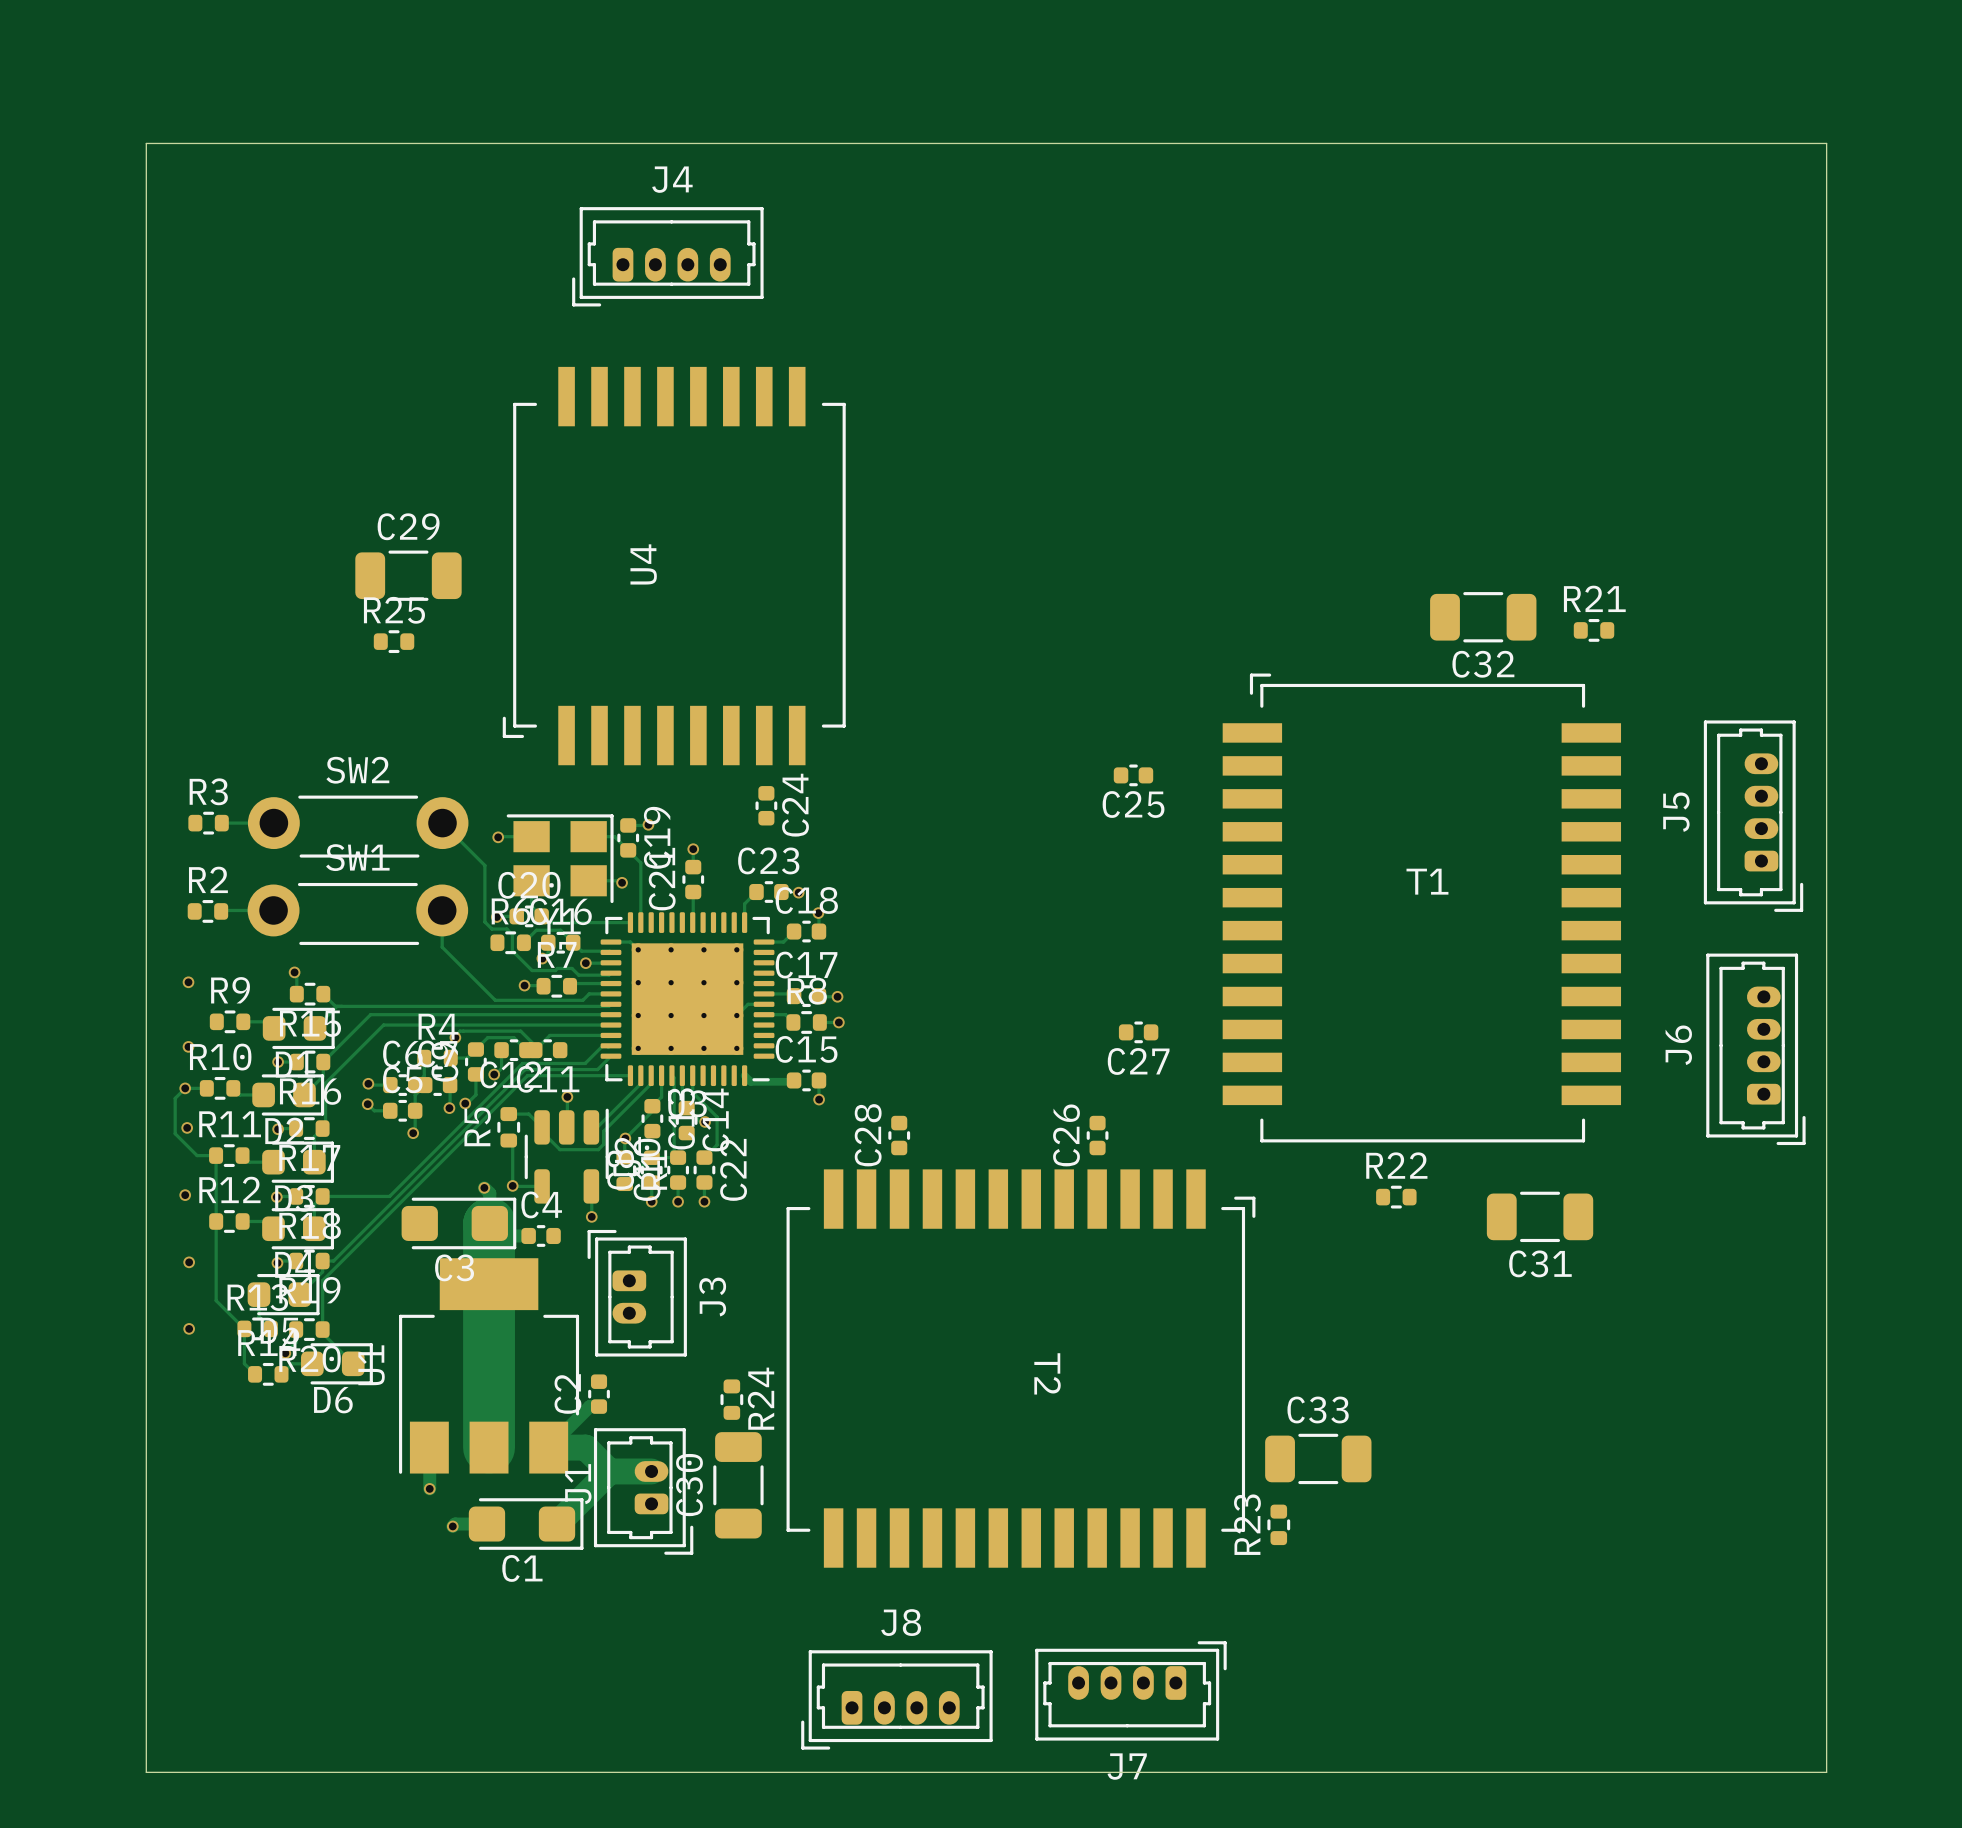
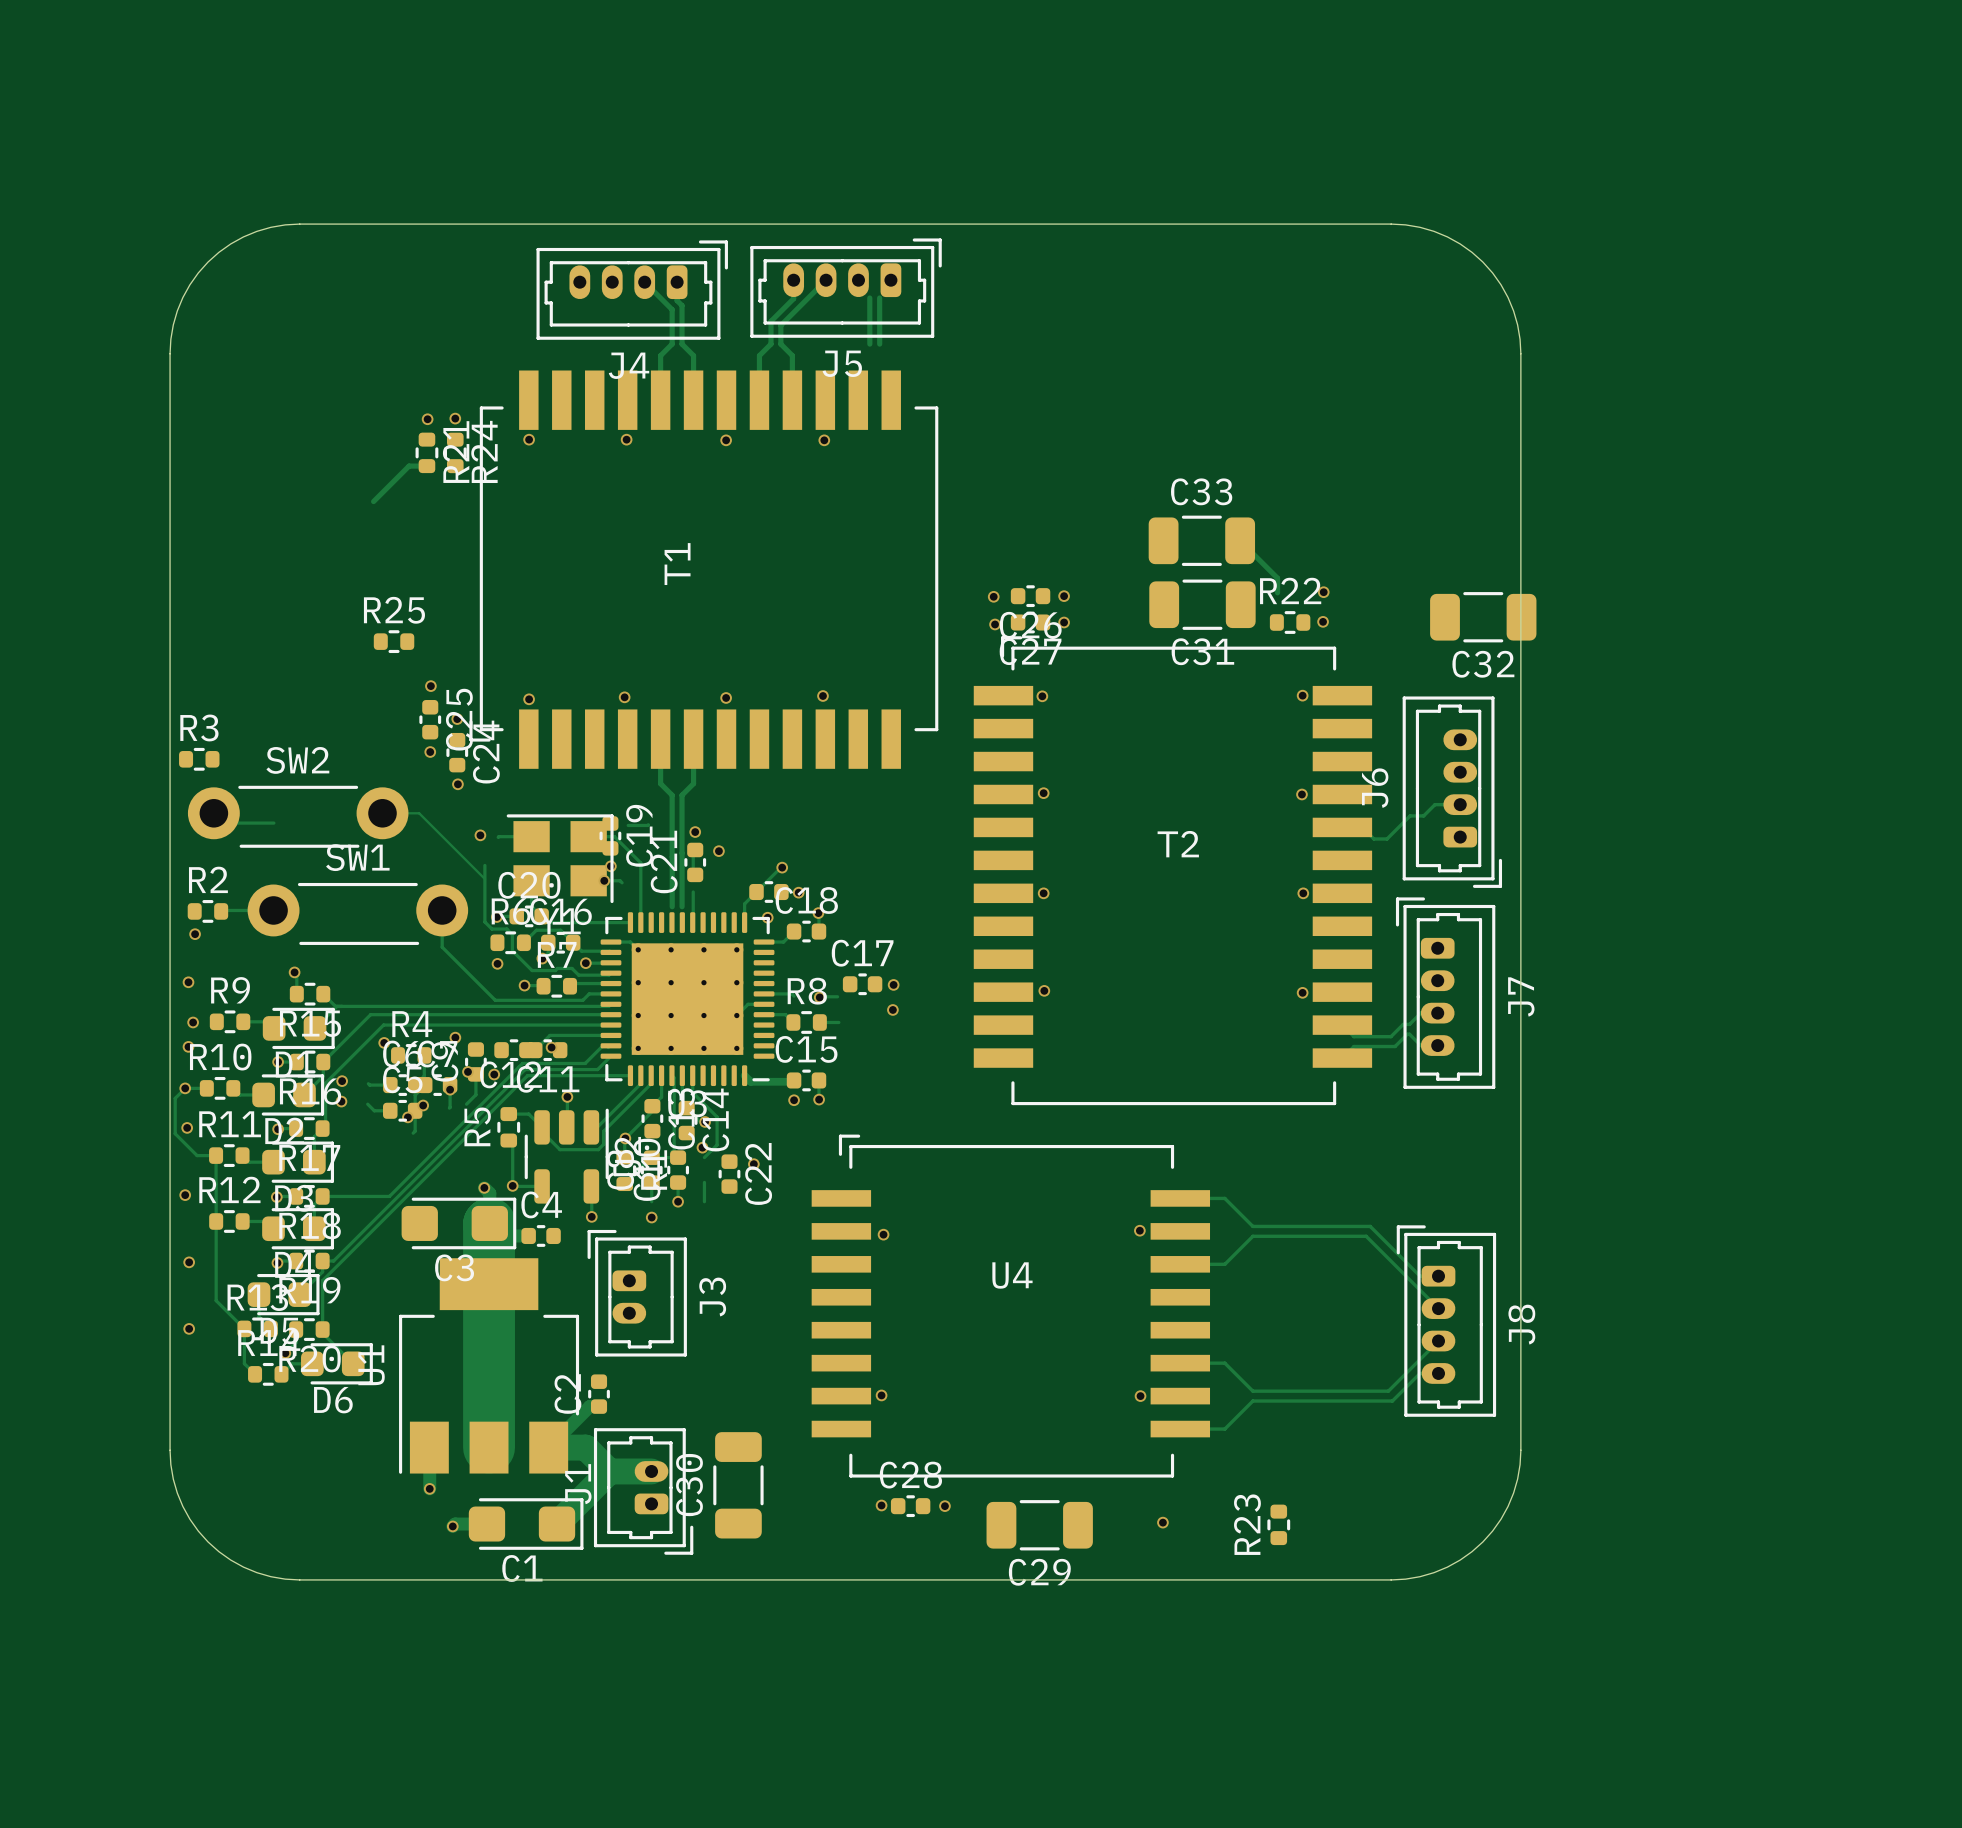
board edge: (146, 143) (1826, 143) (1826, 1772) (146, 1772) (146, 143) -> (299, 224) (270, 227) (243, 236) (218, 252) (208, 262) (189, 284) (182, 297) (173, 324) (170, 339) (170, 1450) (170, 1464) (177, 1493) (182, 1506) (198, 1531) (218, 1551) (243, 1567) (270, 1576) (299, 1579) (1391, 1579) (1405, 1579) (1434, 1572) (1460, 1560) (1472, 1551) (1492, 1531) (1508, 1506) (1517, 1479) (1520, 1450) (1520, 353) (1517, 324) (1513, 310) (1500, 284) (1492, 272) (1472, 252) (1447, 236) (1420, 227) (1391, 224) (299, 224)
J4 rotation: 0° (667, 256) -> 180° (632, 290)
track: none -> (793, 280) (793, 298) (771, 321) (771, 344) (759, 355) (759, 400)
track: none -> (826, 280) (780, 325) (780, 344) (792, 355) (792, 400)
track: none -> (644, 282) (672, 309) (672, 344) (660, 355) (660, 400)
track: none -> (677, 282) (677, 300) (682, 305) (682, 344) (693, 355) (693, 400)
track: none -> (869, 297) (869, 344)
track: none -> (879, 297) (879, 344)
via: none -> (455, 418)
via: none -> (427, 419)
via: none -> (529, 439)
via: none -> (626, 439)
via: none -> (726, 440)
via: none -> (824, 440)
track: none -> (426, 466) (409, 466) (373, 501)
C29 name position: C29 (408, 526) -> C29 (1039, 1572)
track: none -> (1240, 540) (1277, 578) (1277, 592)
U4 rotation: 0° (674, 566) -> 90° clockwise (1010, 1306)
U4 position: (674, 566) -> (1010, 1306)
C29 position: (408, 575) -> (1039, 1525)
via: none -> (1323, 592)
via: none -> (993, 596)
via: none -> (1064, 596)
via: none -> (1323, 621)
via: none -> (1064, 622)
via: none -> (995, 624)
R21 rotation: 0° (1594, 630) -> 90° clockwise (426, 452)
R21 position: (1594, 630) -> (426, 452)
via: none -> (430, 686)
via: none -> (1302, 695)
via: none -> (822, 696)
via: none -> (1042, 696)
via: none -> (624, 697)
via: none -> (726, 697)
via: none -> (529, 699)
via: none -> (457, 719)
track: none -> (660, 739) (660, 783) (672, 795) (672, 856)
track: none -> (693, 739) (693, 783) (682, 795) (682, 853)
via: none -> (430, 752)
C25 rotation: 0° (1133, 775) -> 90° clockwise (430, 719)
C25 position: (1133, 775) -> (430, 719)
via: none -> (457, 784)
via: none -> (1043, 793)
via: none -> (1301, 794)
track: none -> (1460, 804) (1434, 804) (1423, 815) (1410, 815) (1387, 838) (1373, 838) (1362, 827) (1342, 827)
C24 position: (766, 805) -> (457, 752)
track: none -> (382, 813) (419, 813) (485, 879)
J5 rotation: 0° (1753, 816) -> 90° counterclockwise (846, 288)
J5 position: (1753, 816) -> (846, 288)
R3 position: (208, 823) -> (199, 759)
track: (442, 823) (484, 865) -> none
via: (648, 824) -> none
SW2 position: (358, 826) -> (298, 816)
via: none -> (695, 832)
via position: (498, 837) -> (480, 835)
C19 position: (628, 837) -> (610, 835)
via: (693, 849) -> none
via: none -> (718, 851)
track: none -> (682, 853) (682, 906)
track: none -> (672, 856) (672, 906)
C23 name: C23 (768, 860) -> none
via: none -> (610, 866)
track: none -> (782, 867) (756, 892)
via: none -> (782, 867)
C21 position: (693, 879) -> (695, 862)
via: none -> (604, 880)
via: (622, 882) -> none
via: none -> (1043, 893)
via: none -> (1303, 893)
T1 rotation: 0° (1421, 907) -> 90° counterclockwise (703, 569)
T1 position: (1421, 907) -> (703, 569)
via: none -> (767, 917)
via: none -> (195, 934)
via: none -> (497, 963)
via: none -> (893, 984)
via: none -> (1044, 990)
via: none -> (1302, 992)
C17 position: (806, 996) -> (862, 984)
via: (837, 996) -> none
via: none -> (819, 997)
via: none -> (892, 1009)
track: none -> (1437, 1013) (1420, 1013) (1409, 1024) (1403, 1024) (1391, 1036) (1353, 1036) (1342, 1025)
via: none -> (193, 1022)
via: (838, 1022) -> none
C27 position: (1138, 1032) -> (1030, 622)
track: (454, 1036) (459, 1031) (520, 1031) (535, 1045) (535, 1050) (526, 1050) (513, 1037) (487, 1037) (467, 1058) (450, 1058) -> none
via: none -> (384, 1042)
track: none -> (1437, 1045) (1420, 1045) (1407, 1034) (1395, 1046) (1353, 1046) (1342, 1058)
via: none -> (551, 1047)
J6 position: (1755, 1049) -> (1452, 792)
track: (501, 1050) (501, 1068) (497, 1072) -> none
R4 position: (437, 1058) -> (411, 1055)
via: none -> (467, 1071)
via: none -> (342, 1081)
via: (368, 1083) -> none
via: none -> (450, 1089)
via: none -> (794, 1100)
via: none -> (341, 1101)
via: (465, 1103) -> none
via: (367, 1104) -> none
via: none -> (423, 1105)
via: (449, 1108) -> none
via: none -> (407, 1117)
via: (413, 1133) -> none
C28 rotation: 0° (899, 1135) -> 90° clockwise (910, 1506)
C28 position: (899, 1135) -> (910, 1506)
C26 rotation: 0° (1097, 1135) -> 90° clockwise (1030, 596)
C26 position: (1097, 1135) -> (1030, 596)
via: none -> (702, 1147)
via: none -> (753, 1164)
C22 position: (704, 1170) -> (729, 1174)
R22 position: (1396, 1197) -> (1290, 622)
track: none -> (1180, 1198) (1224, 1198) (1252, 1226) (1370, 1226) (1420, 1276) (1438, 1276)
via position: (651, 1201) -> (651, 1217)
via: (704, 1201) -> none
C31 position: (1540, 1216) -> (1202, 604)
via: none -> (1139, 1230)
via: none -> (883, 1234)
track: none -> (1180, 1264) (1224, 1264) (1252, 1236) (1366, 1236) (1438, 1308)
track: none -> (1438, 1341) (1388, 1391) (1252, 1391) (1224, 1363) (1180, 1363)
T2 rotation: 0° (1020, 1368) -> 90° counterclockwise (1172, 870)
T2 position: (1020, 1368) -> (1172, 870)
track: none -> (1438, 1373) (1420, 1373) (1392, 1401) (1252, 1401) (1224, 1429) (1180, 1429)
via: none -> (881, 1395)
via: none -> (1140, 1396)
R24 position: (731, 1399) -> (455, 452)
C33 position: (1318, 1458) -> (1201, 540)
via: none -> (881, 1505)
via: none -> (944, 1506)
via: none -> (1162, 1522)
J7 rotation: 0° (1130, 1690) -> 90° counterclockwise (1445, 993)
J7 position: (1130, 1690) -> (1445, 993)
J8 rotation: 0° (896, 1699) -> 90° clockwise (1446, 1321)
J8 position: (896, 1699) -> (1446, 1321)

